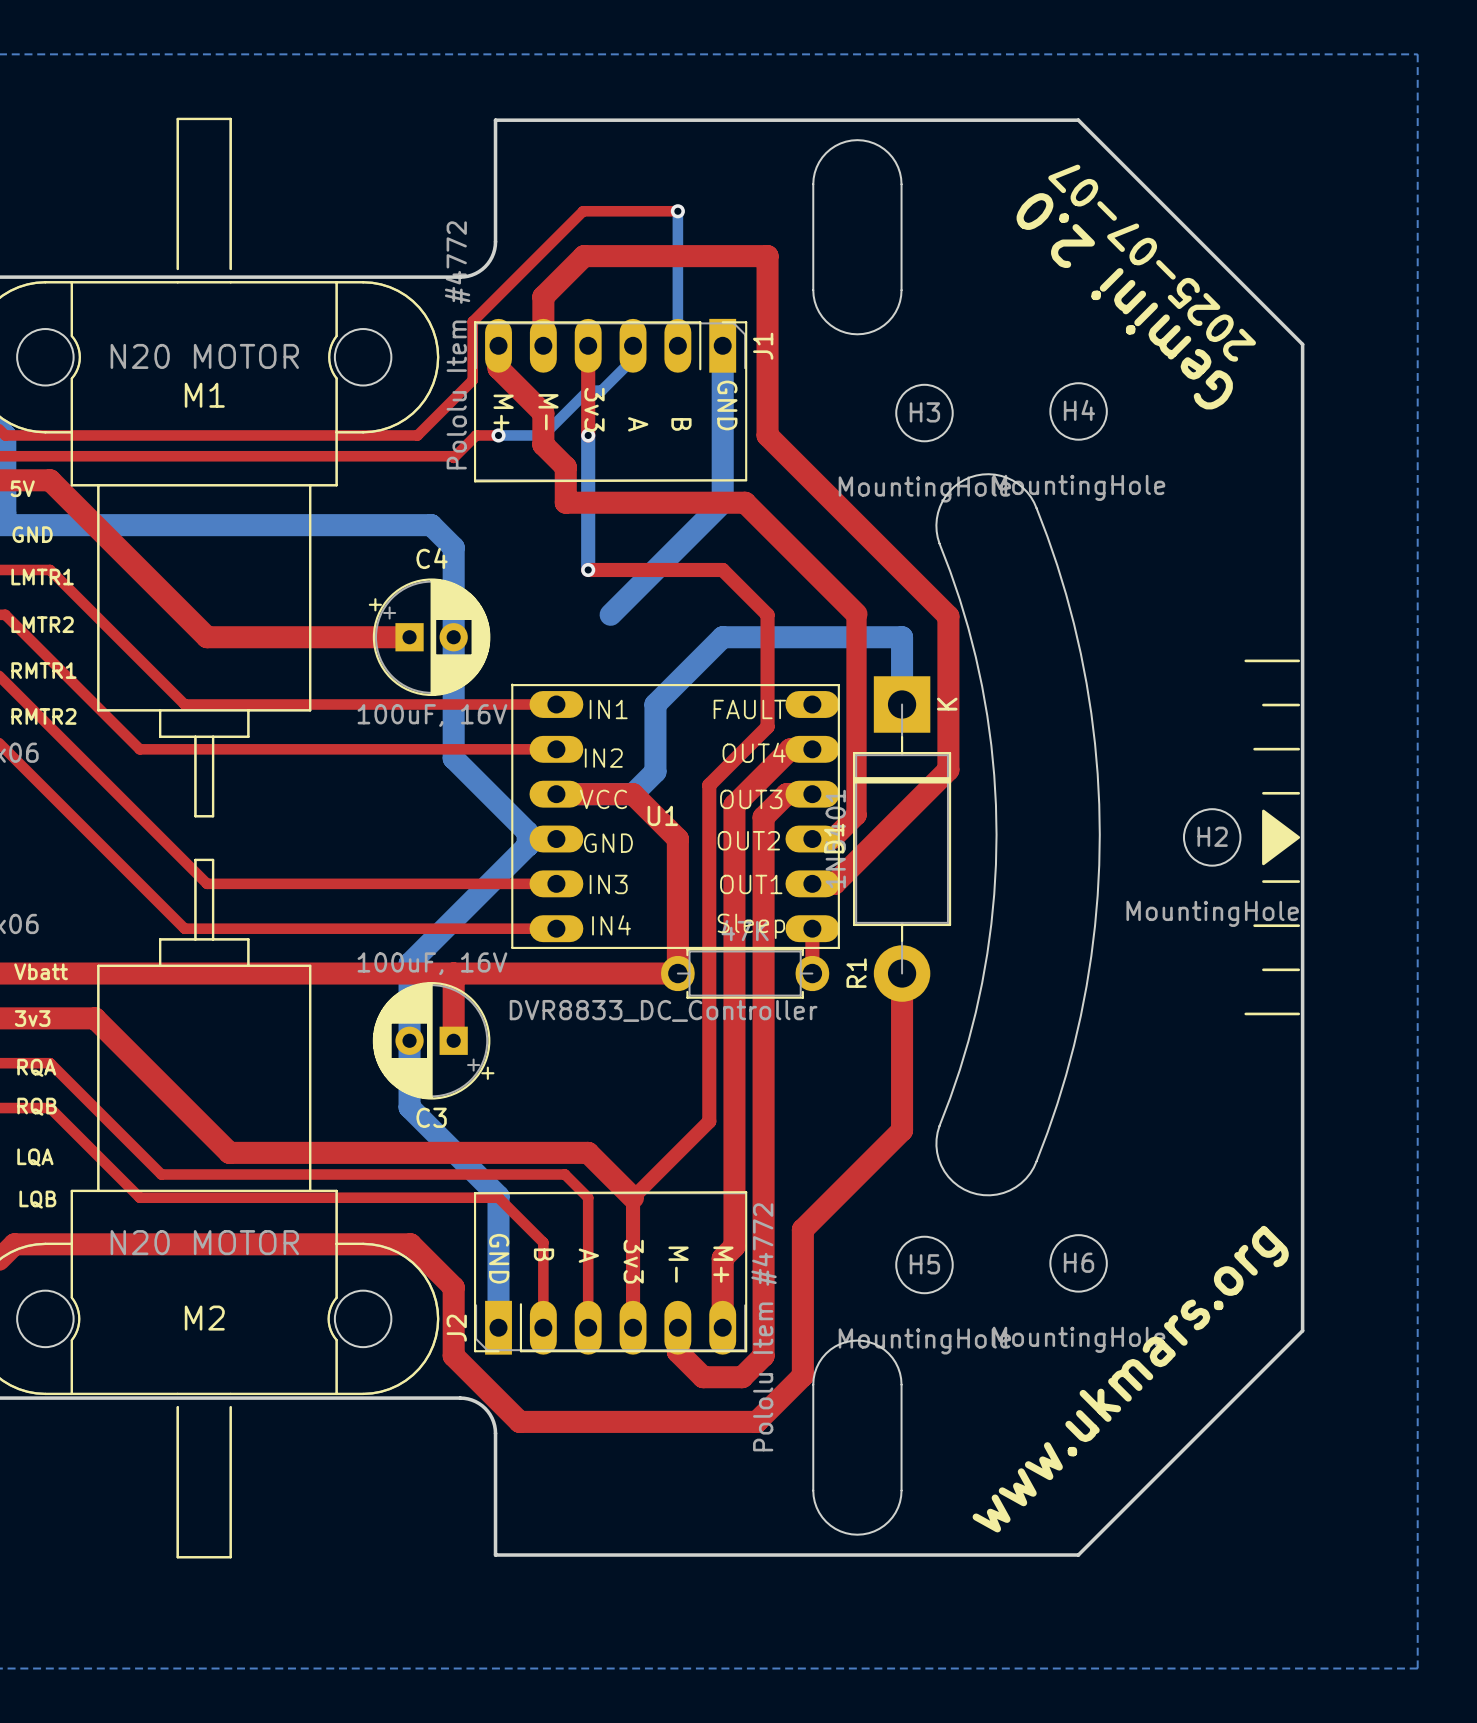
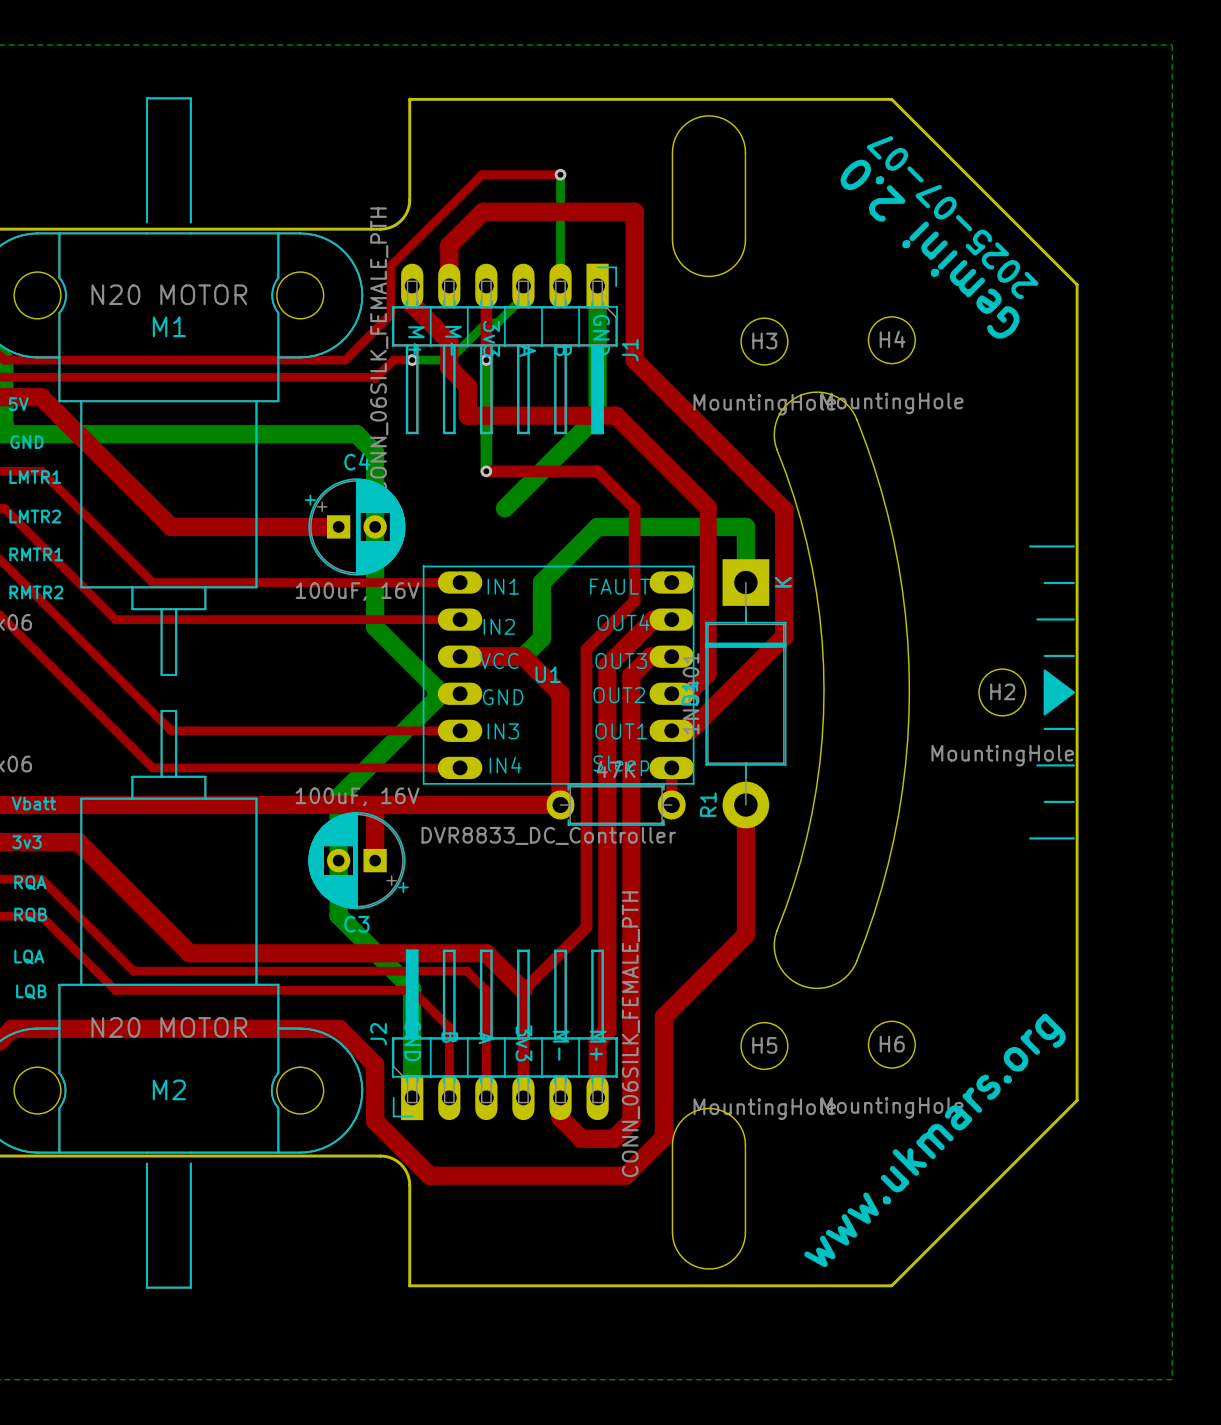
J1 footprint: [473, 318, 748, 483] -> [391, 263, 618, 435]
J1 value: Pololu Item #4772 (457, 345) -> CONN_06SILK_FEMALE_PTH (379, 350)
J1 name position: J1 (763, 346) -> J1 (630, 350)
J2 footprint: [473, 1191, 748, 1355] -> [391, 949, 618, 1121]
J2 value: Pololu Item #4772 (764, 1327) -> CONN_06SILK_FEMALE_PTH (630, 1034)
J2 name position: J2 (456, 1328) -> J2 (378, 1034)

